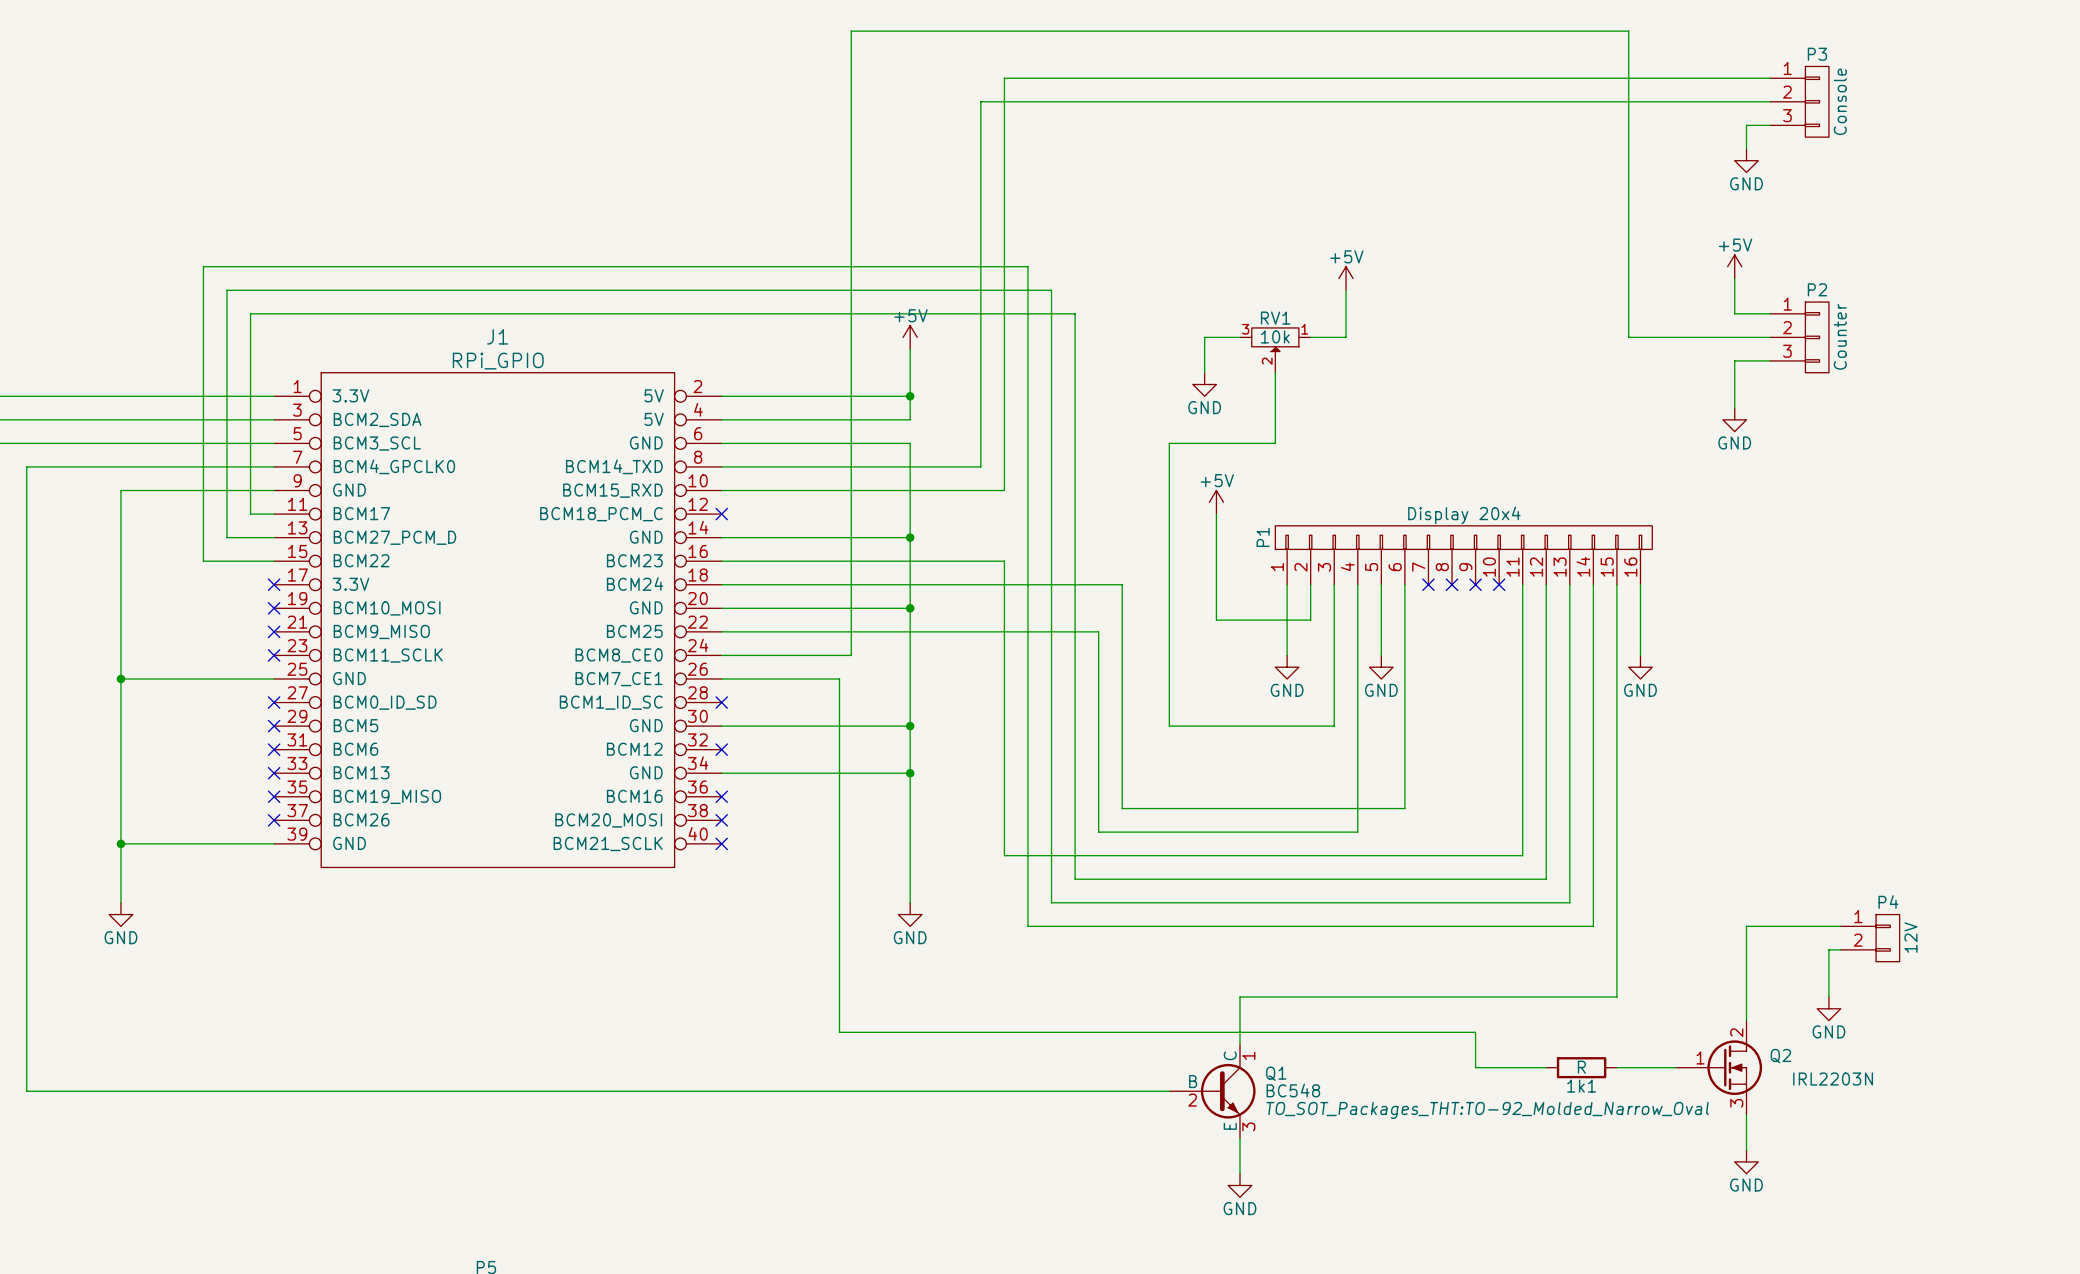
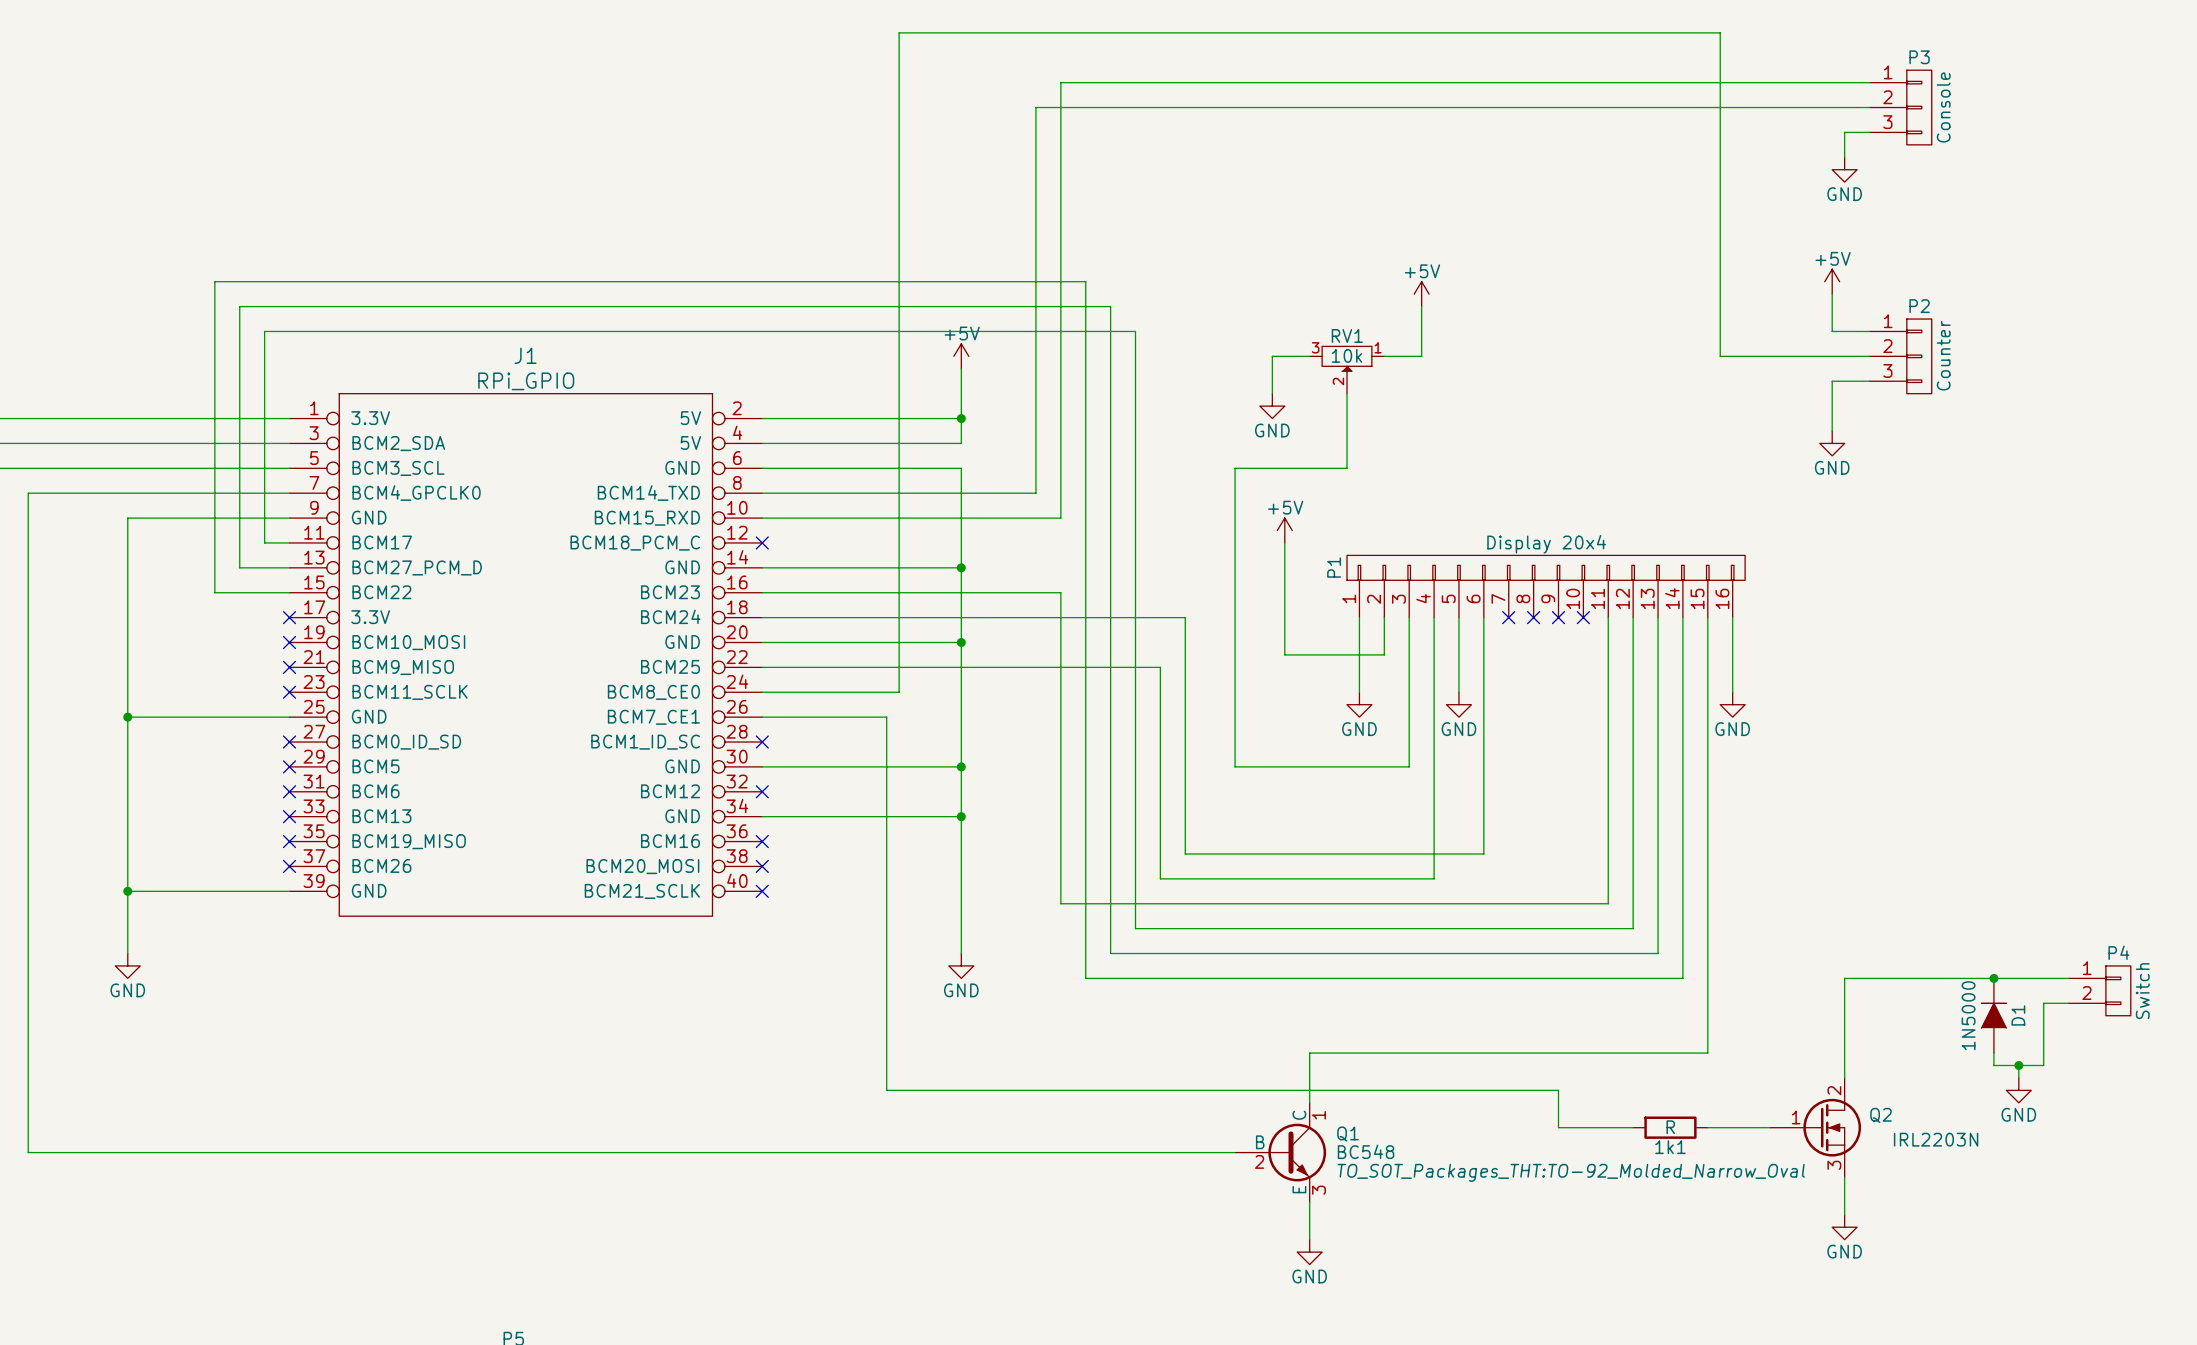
wire: none -> (1944, 978) (2068, 978)
junction: none -> (1993, 978)
P4 value: 12V (1910, 937) -> Switch (2142, 991)
P4 position: (1870, 938) -> (2099, 990)
wire: (1840, 949) (1828, 949) (1828, 997) -> none
wire: none -> (2068, 1003) (2043, 1003) (2043, 1065) (1993, 1065) (1993, 1053)
D1: none -> 1N5000 (1993, 1015)
power symbol position: GND (1828, 1008) -> GND (2018, 1090)
wire: none -> (2018, 1065) (2018, 1077)
junction: none -> (2018, 1065)

